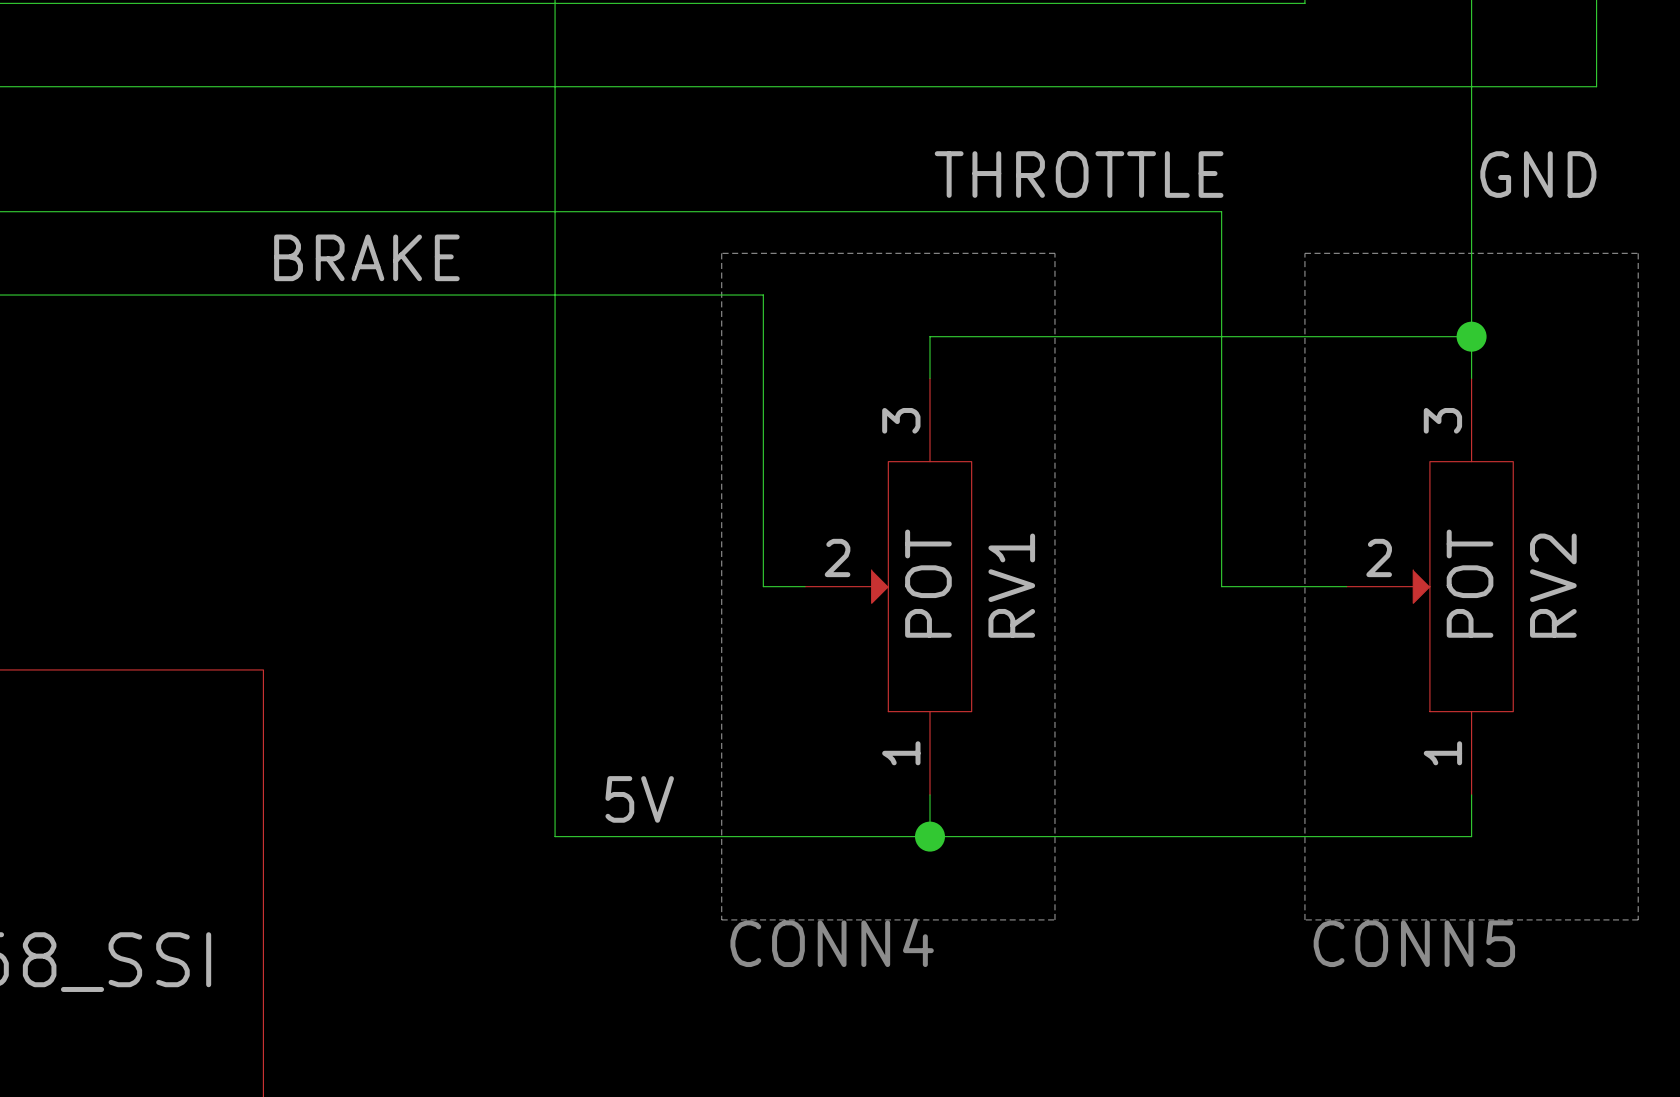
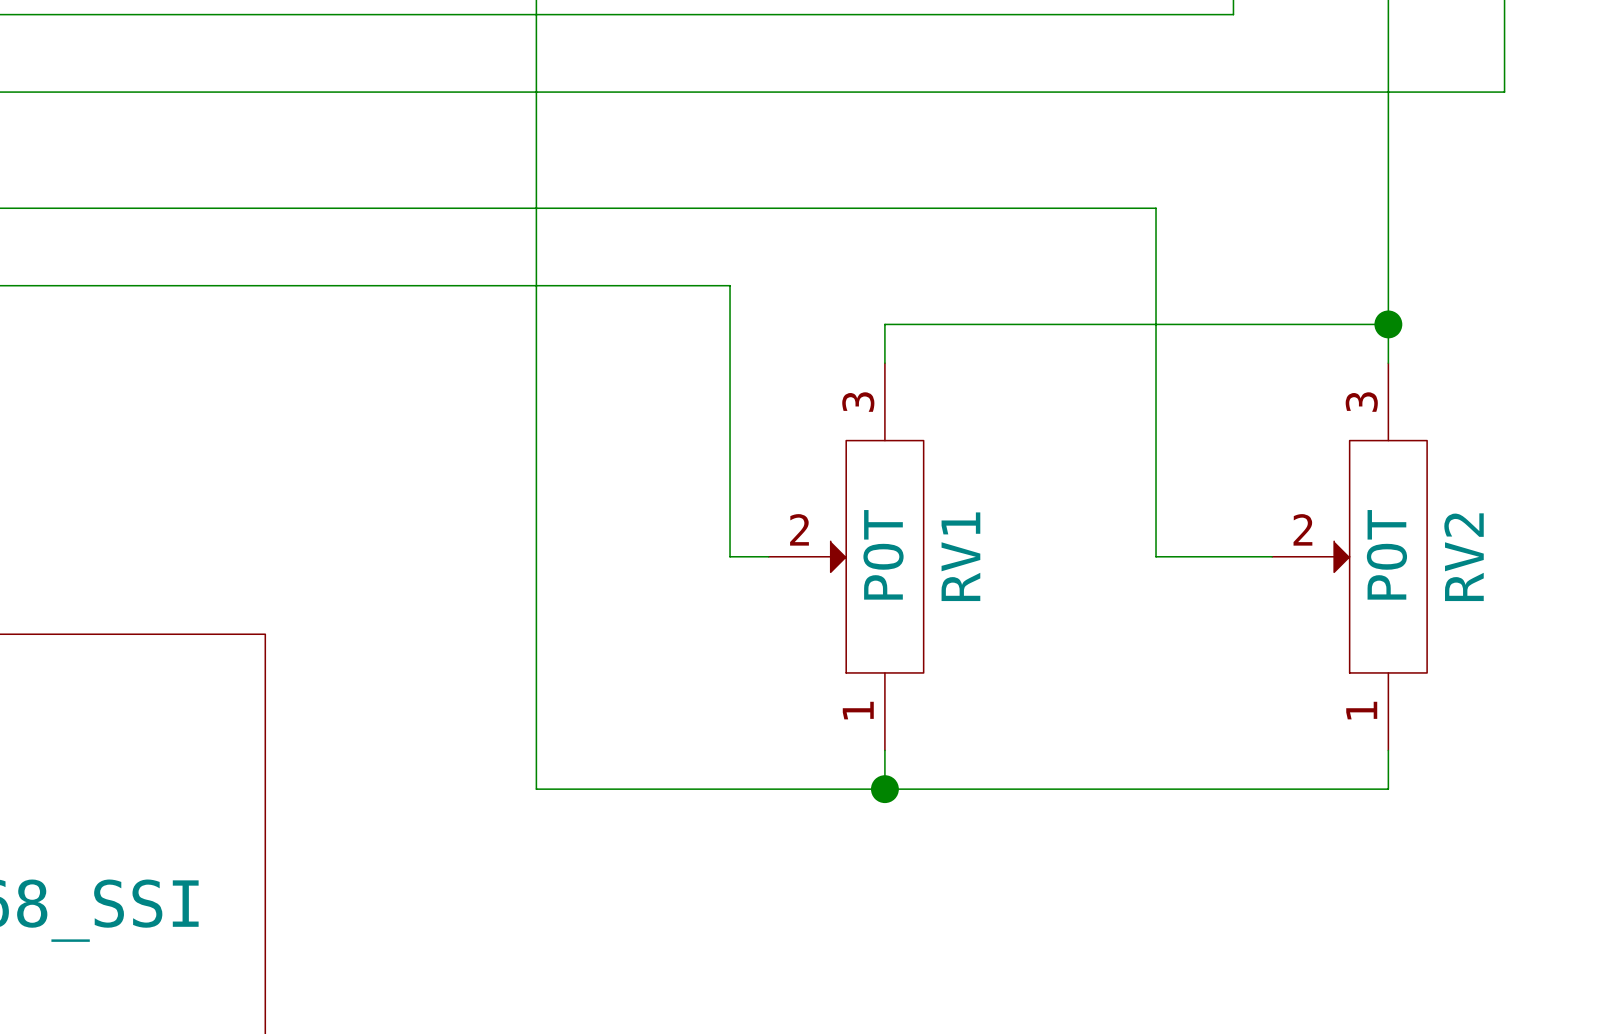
label: THROTTLE (1079, 174) -> none
label: GND (1538, 174) -> none
line: (721, 253) (1054, 253) (1054, 919) (721, 919) (721, 253) -> none
line: (1304, 253) (1638, 253) (1638, 919) (1304, 919) (1304, 253) -> none
label: BRAKE (366, 257) -> none
label: 5V (639, 799) -> none
text: CONN4 (832, 942) -> none
text: CONN5 (1414, 943) -> none

